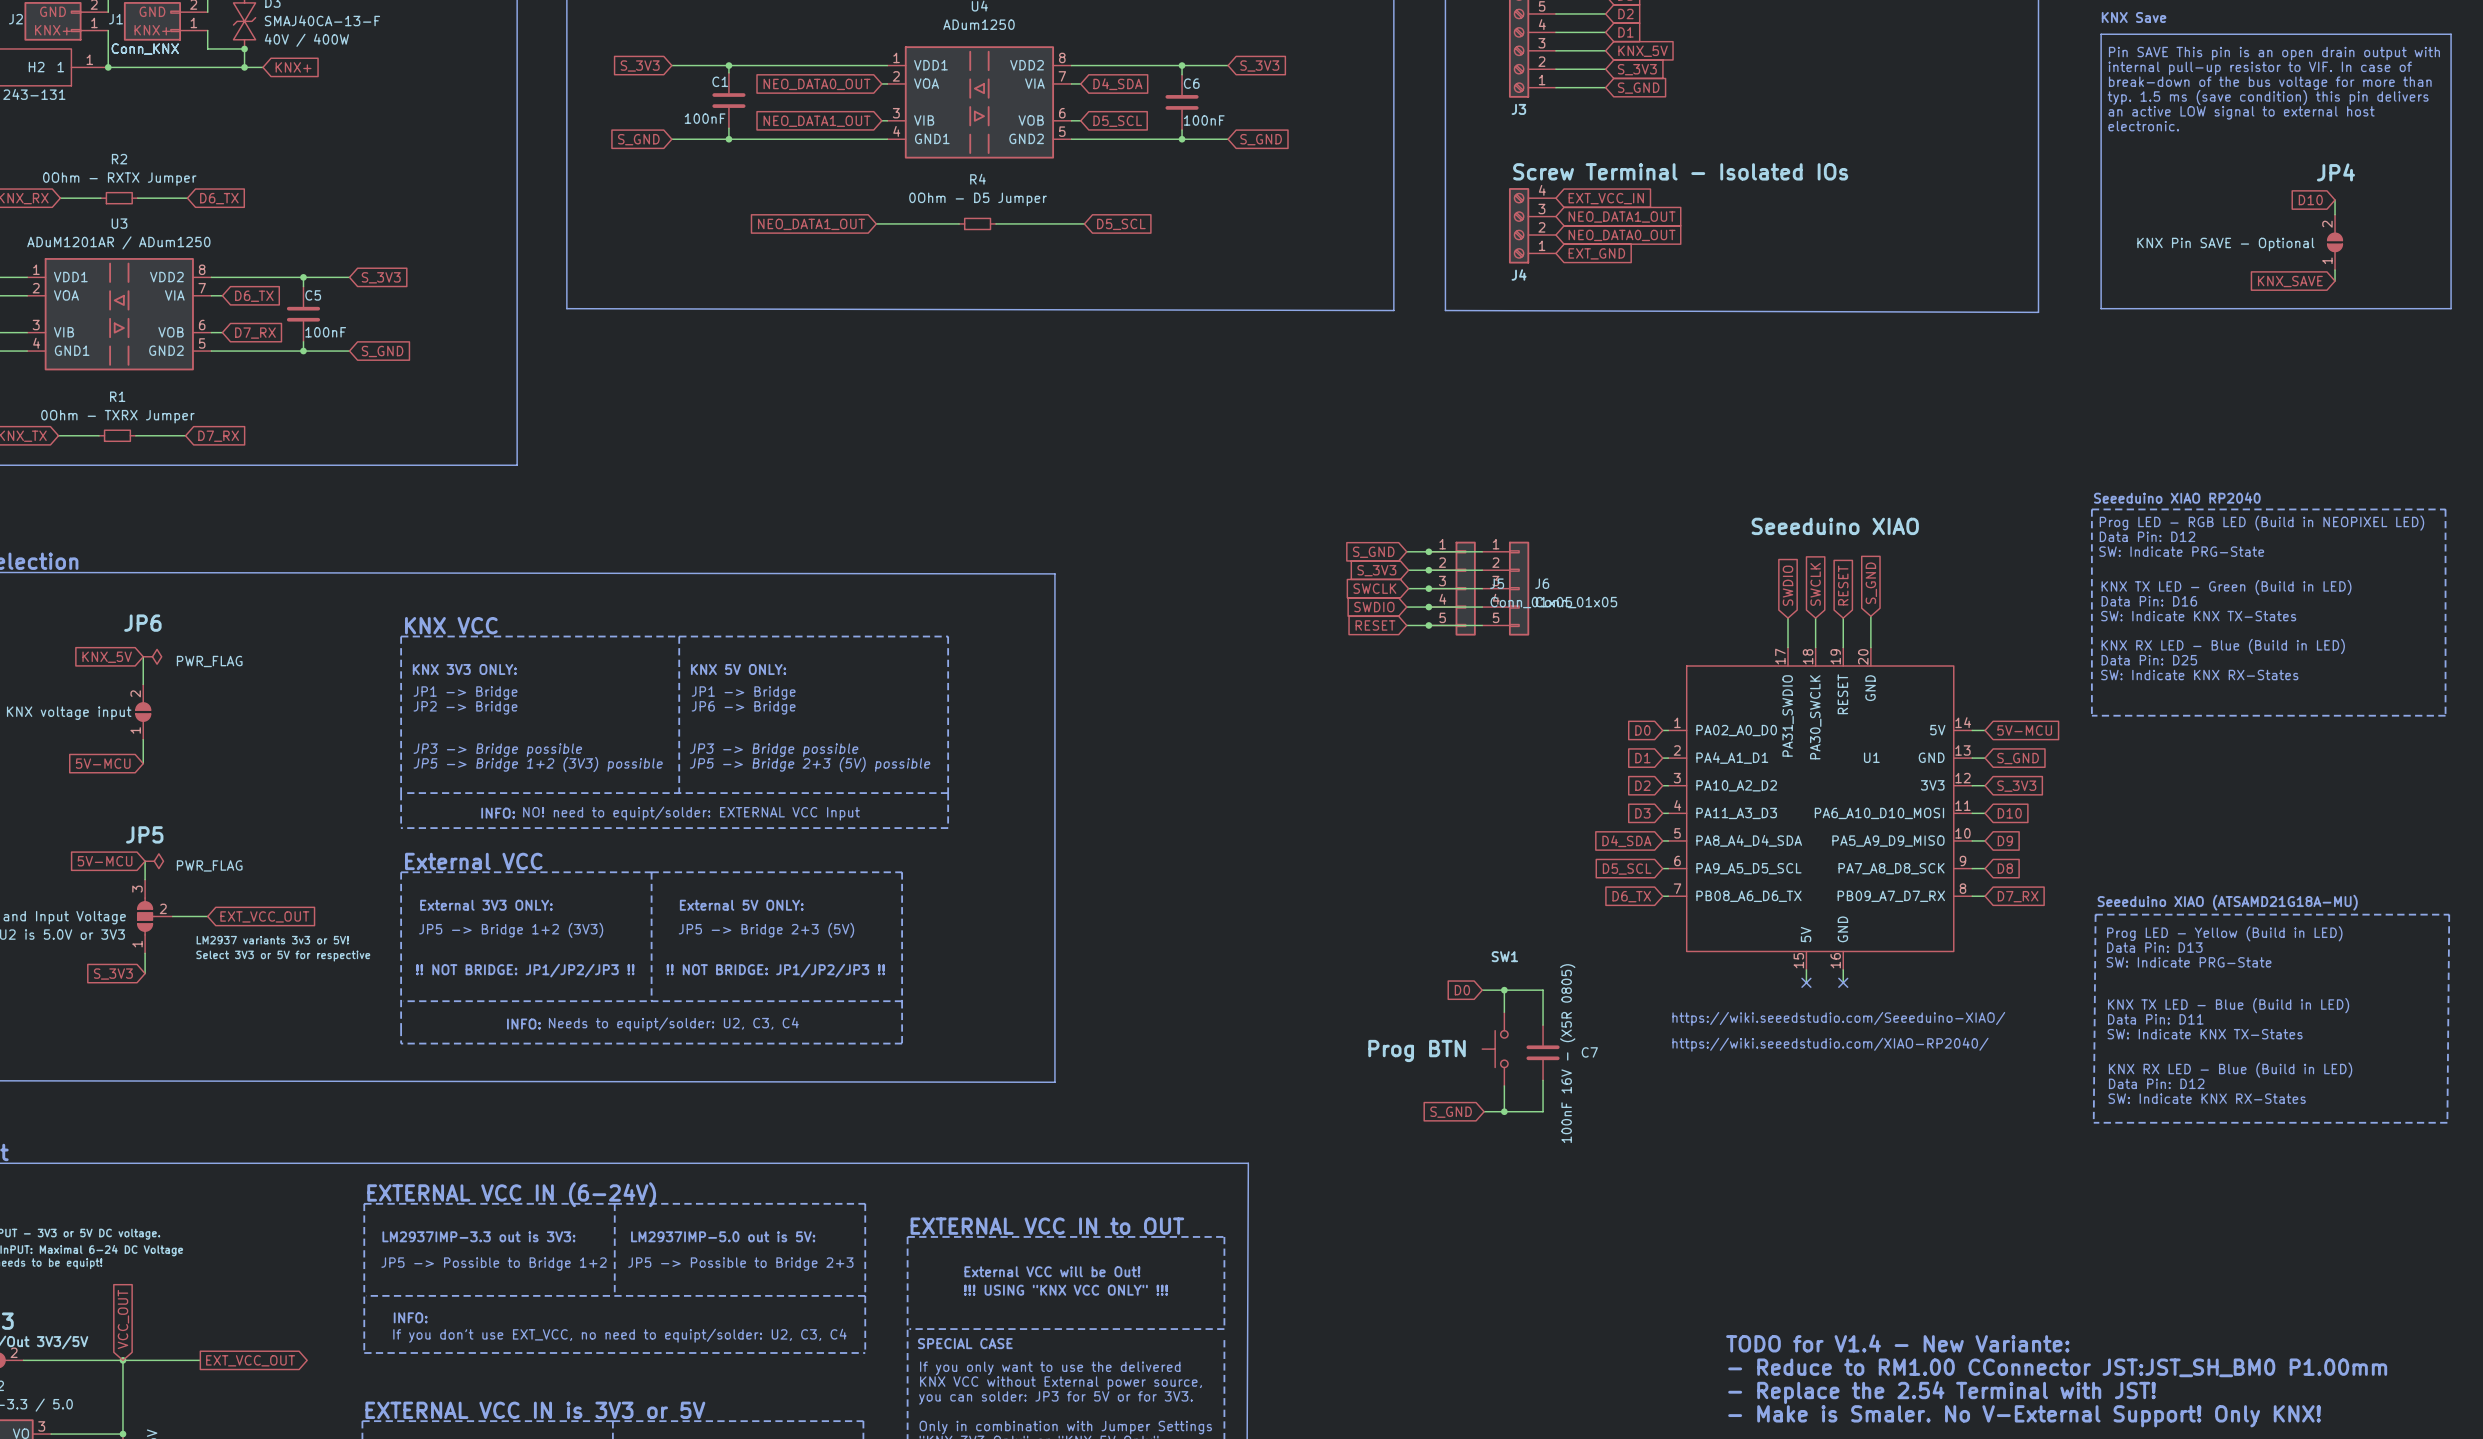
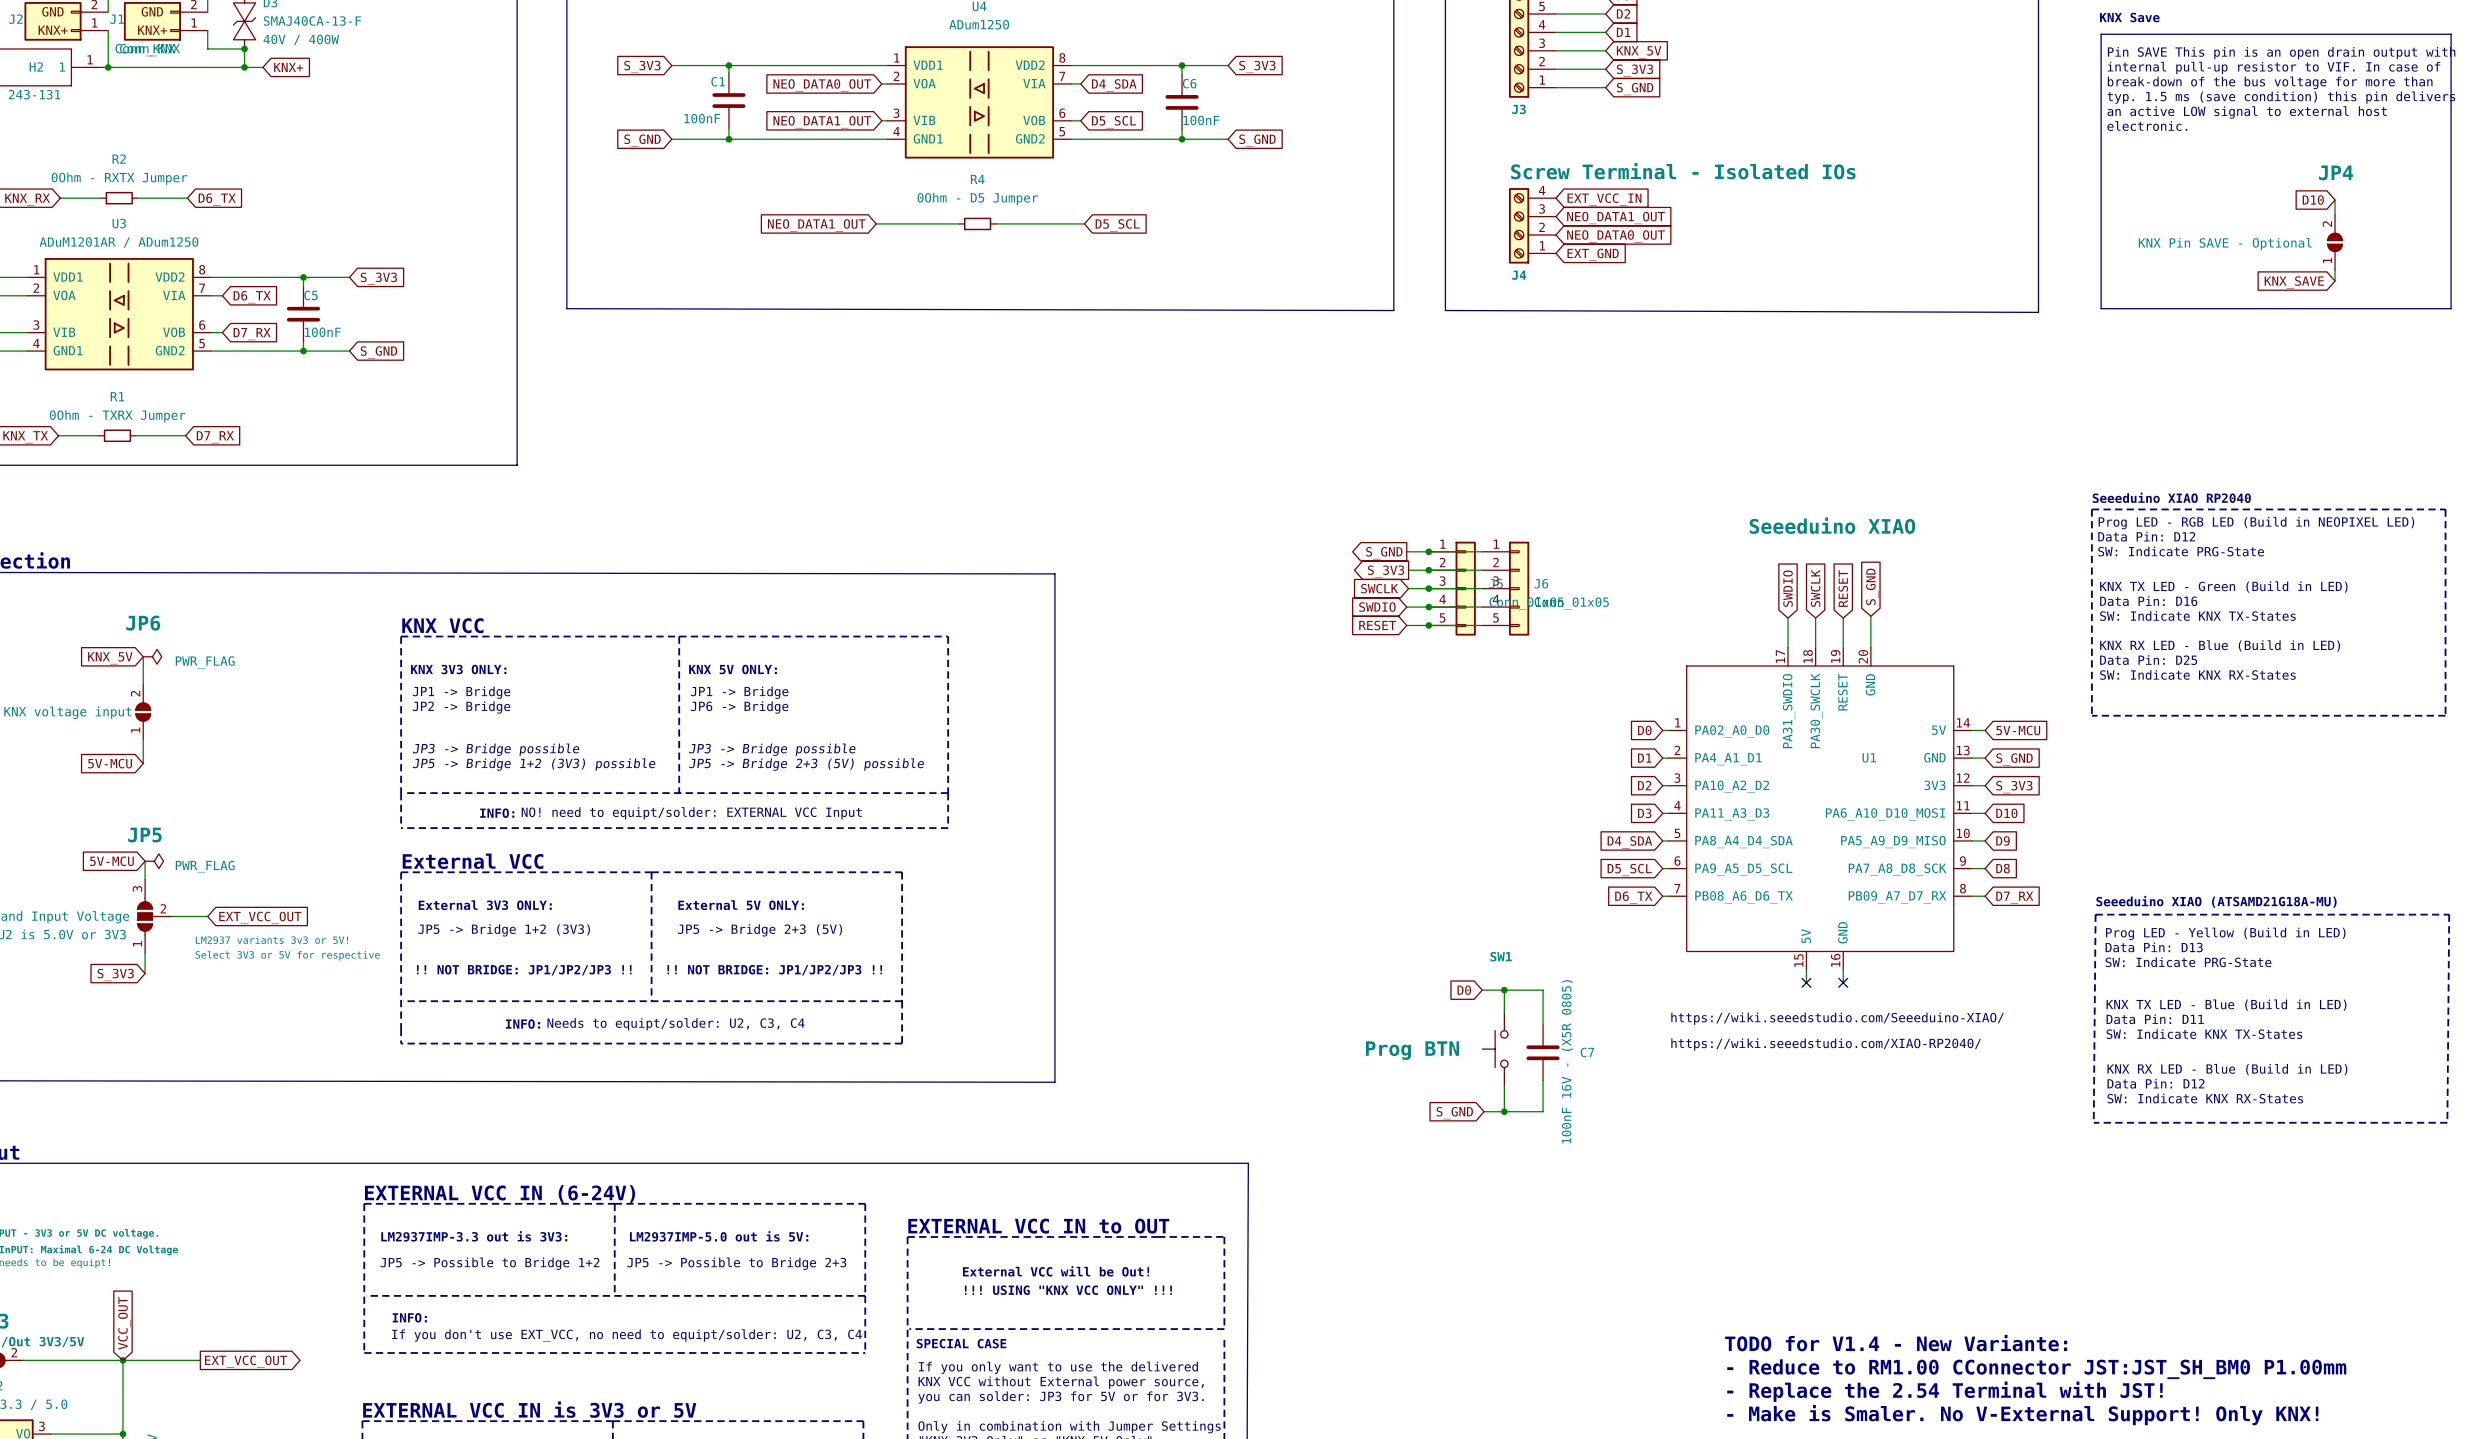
global label shape: input (1373, 552) -> output (1384, 553)
global label shape: input (1376, 570) -> output (1386, 571)

